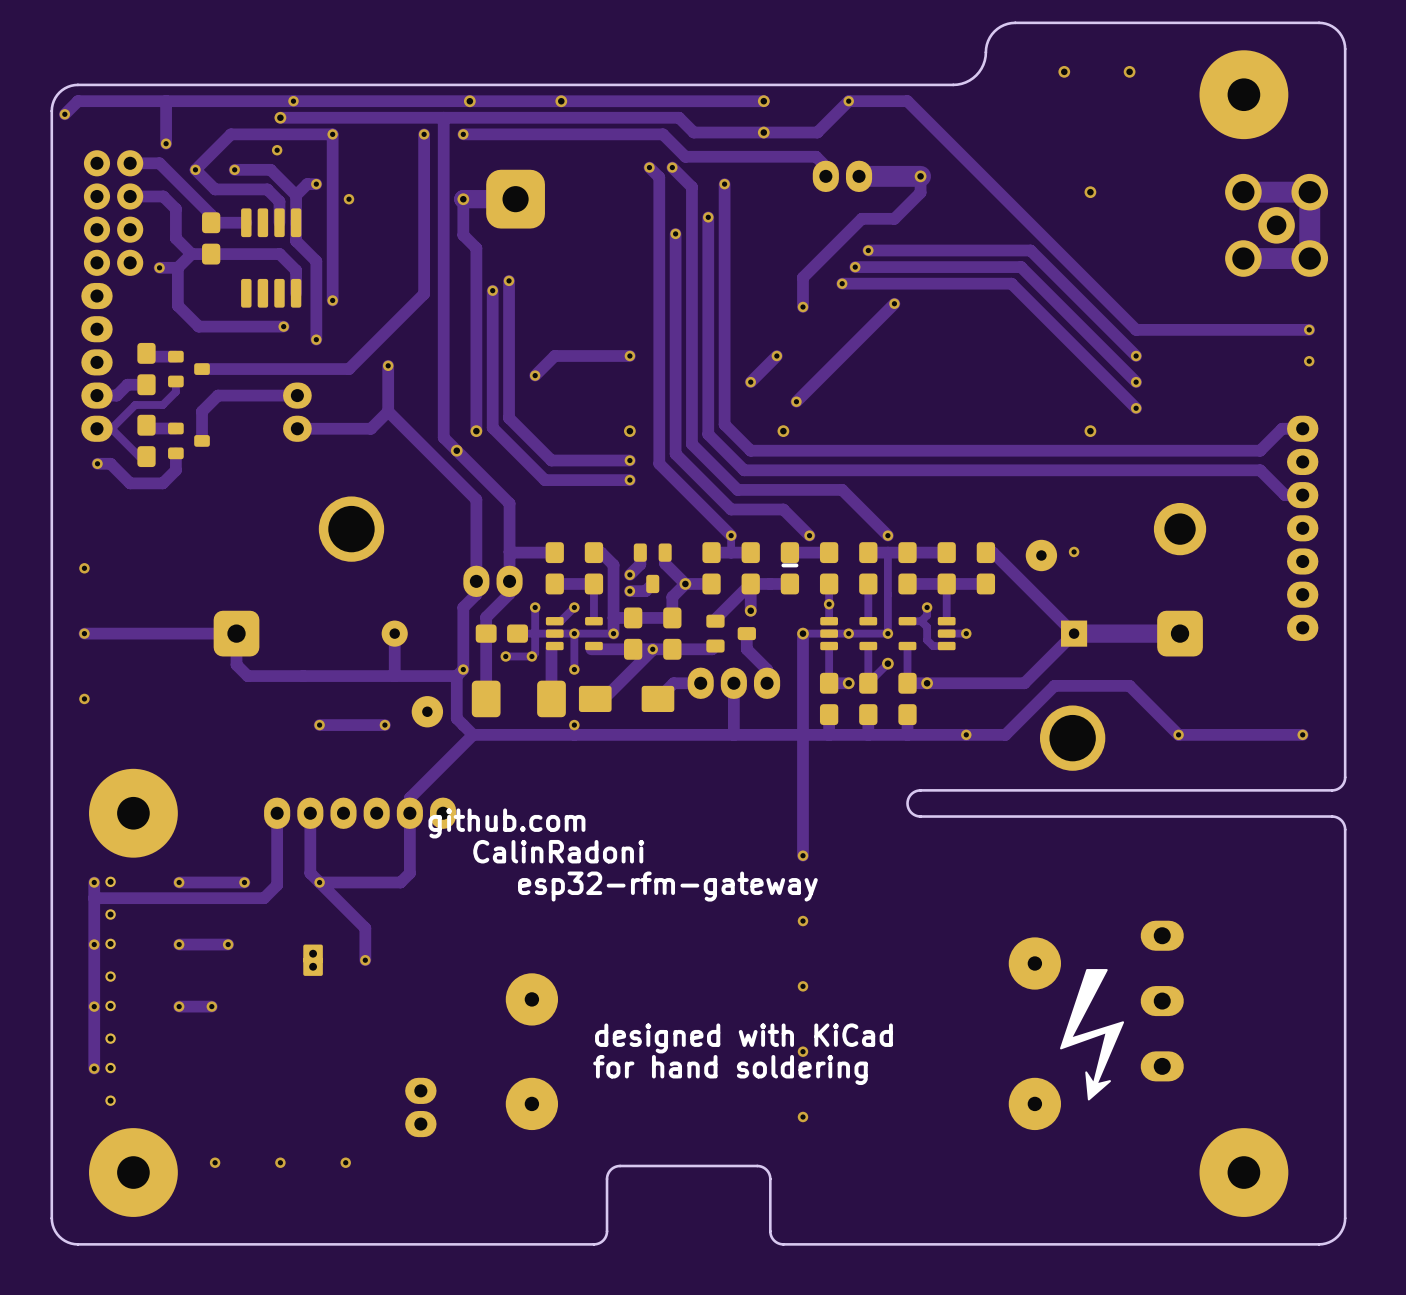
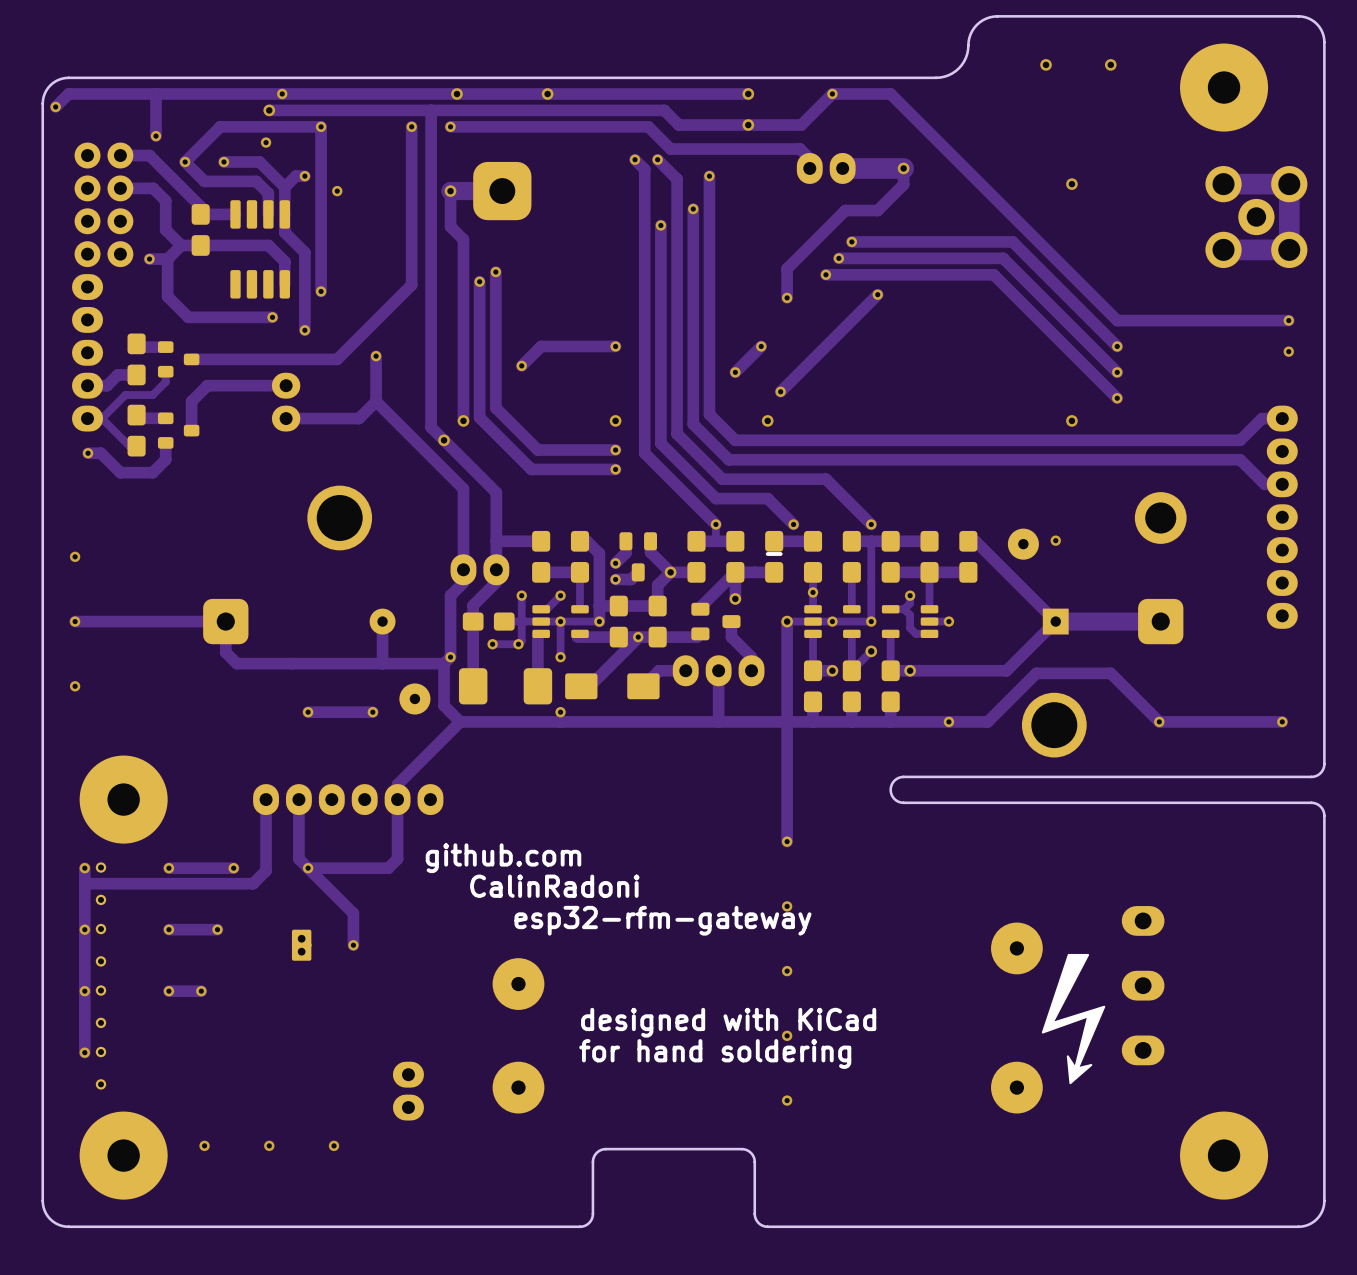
text position: github.com (506, 823) -> github.com (503, 858)
text position: CalinRadoni (558, 851) -> CalinRadoni (554, 886)
text position: esp32-rfm-gateway (667, 886) -> esp32-rfm-gateway (662, 920)

